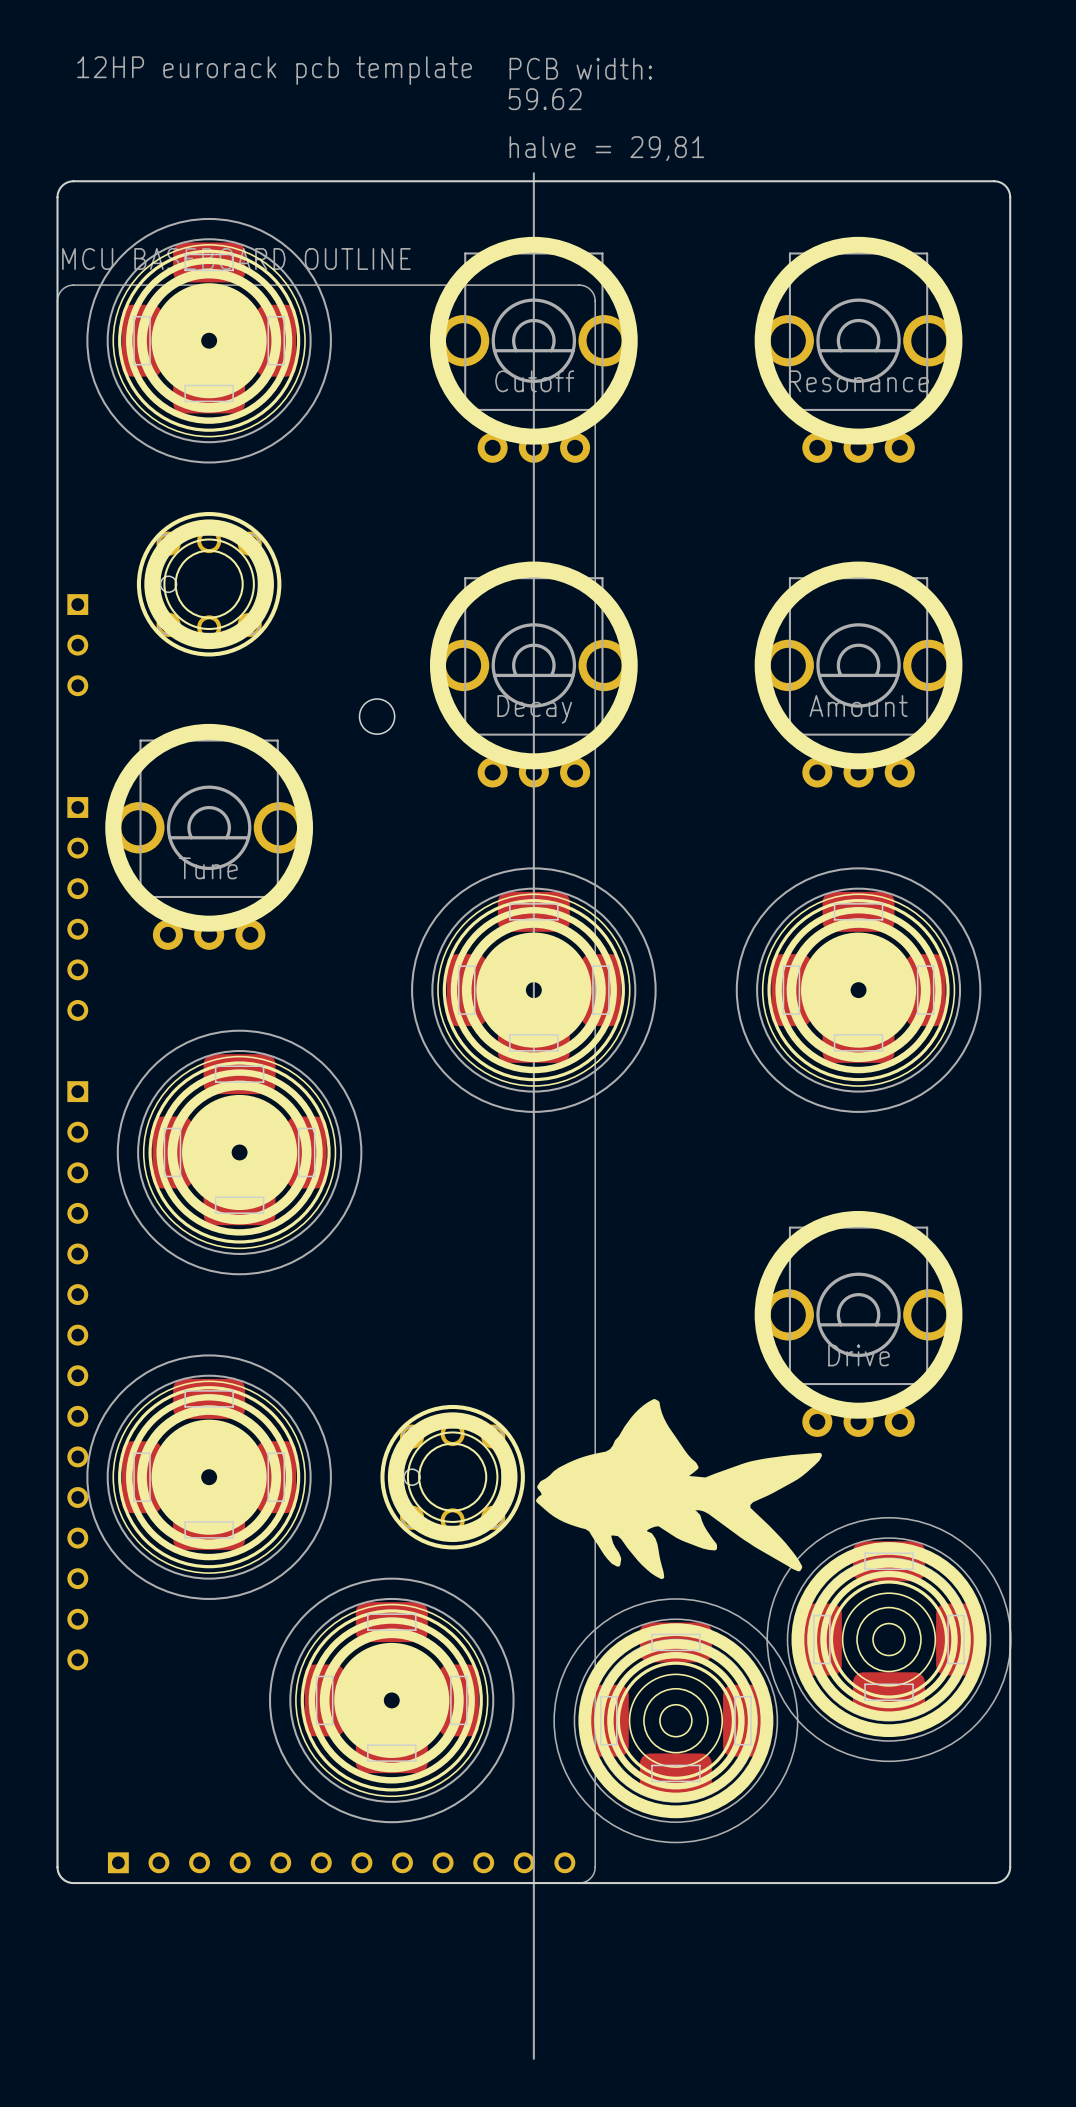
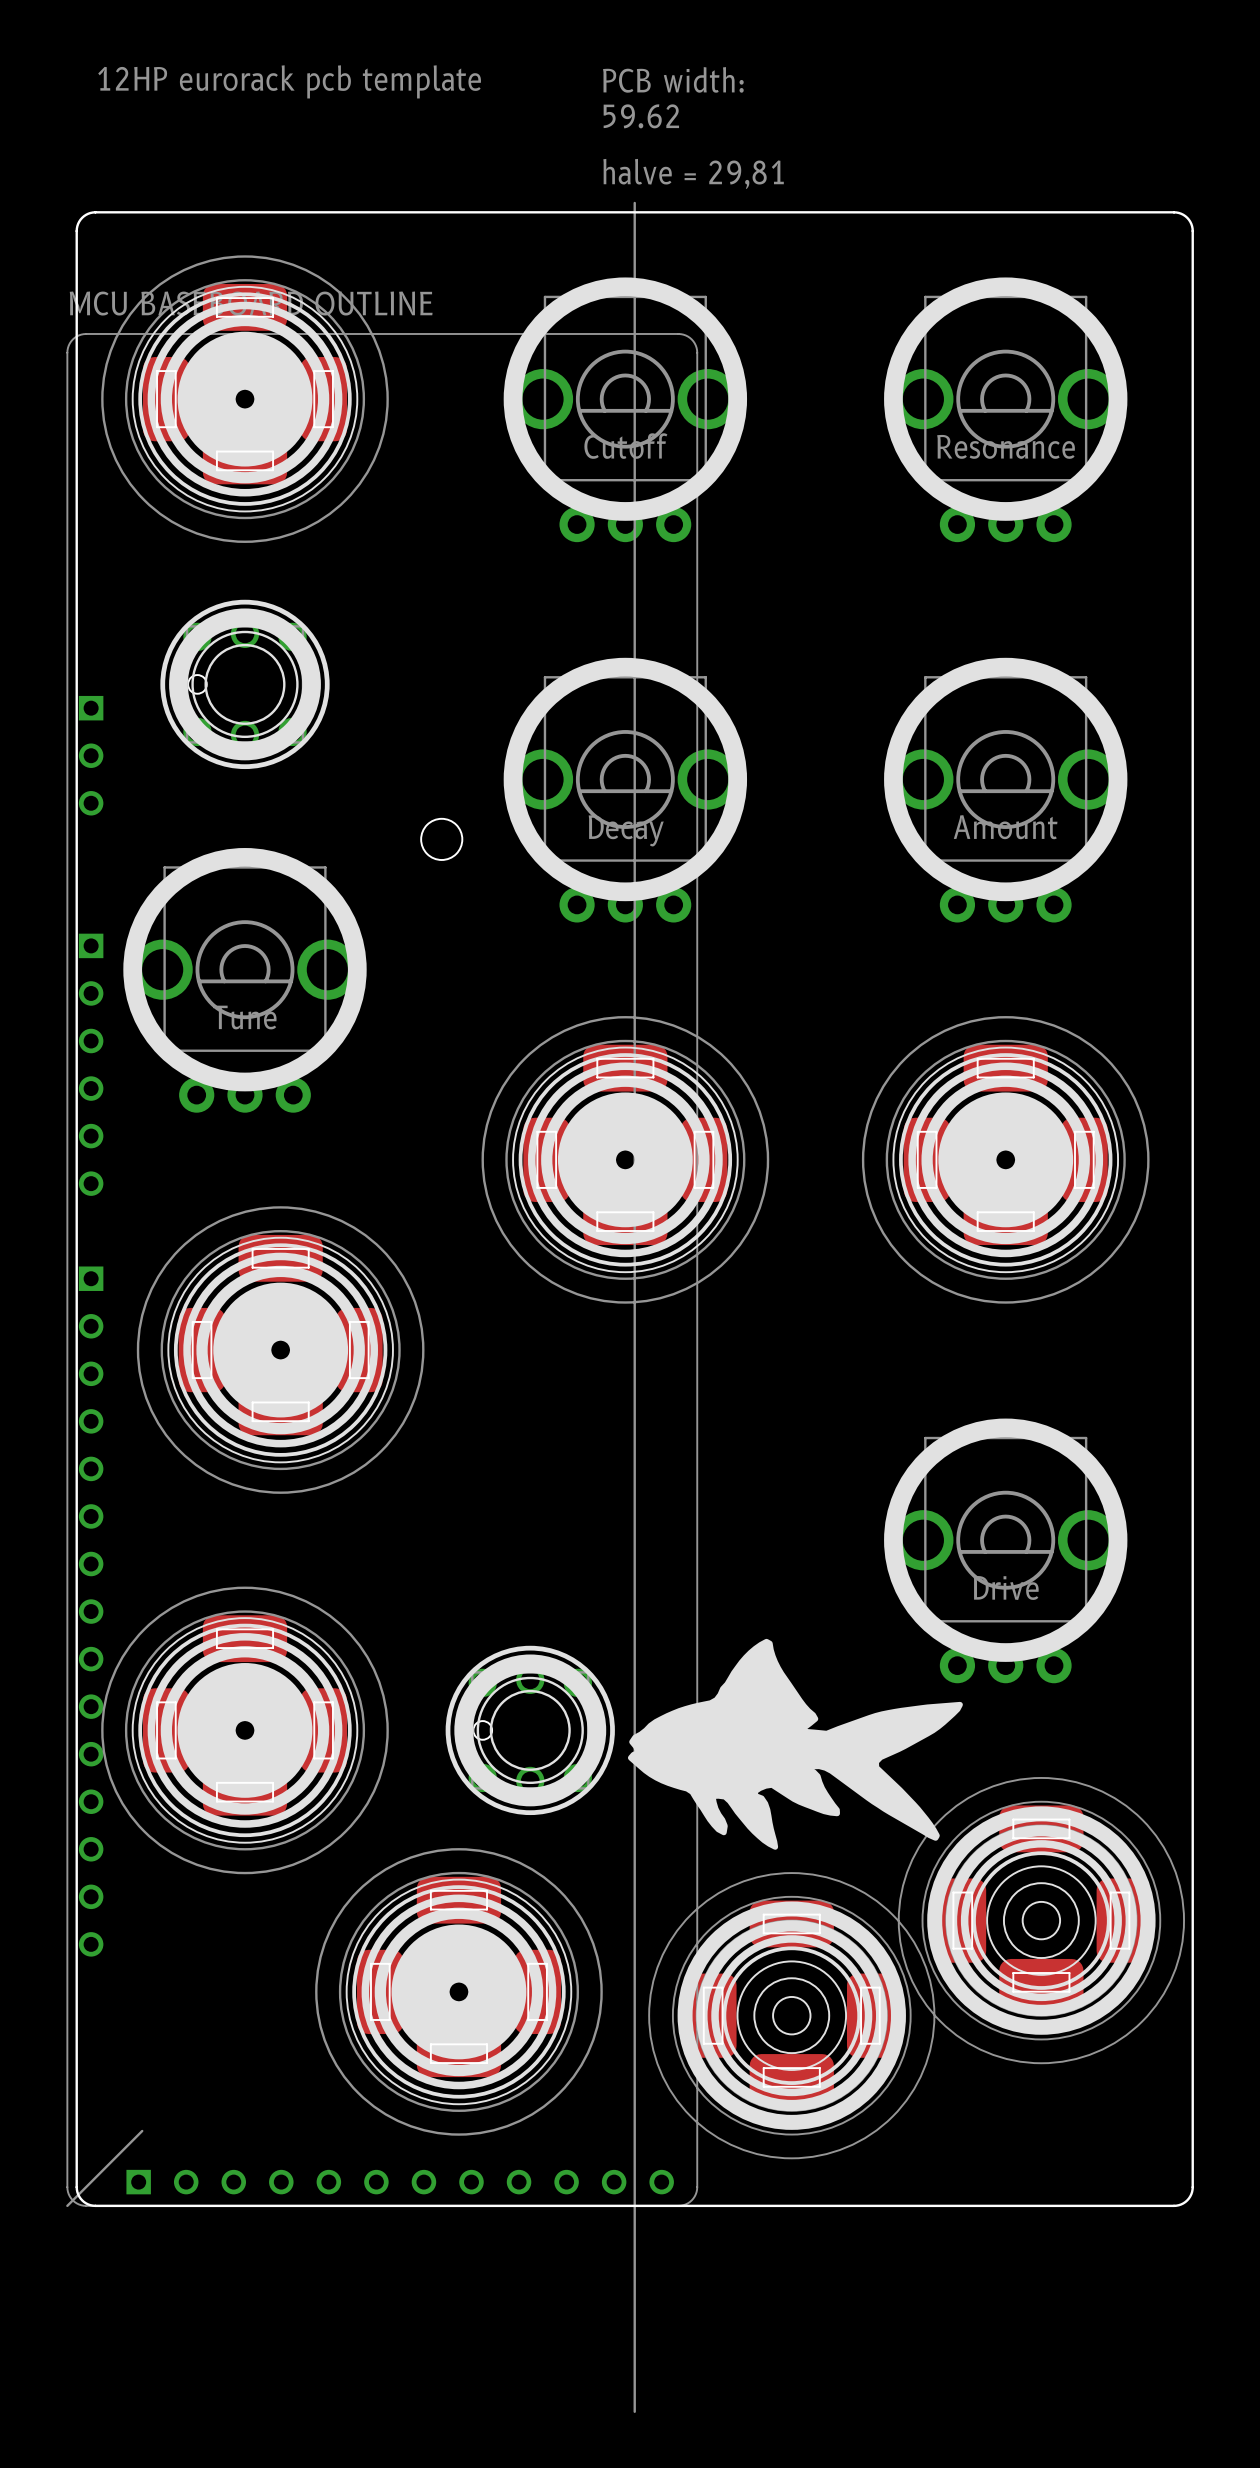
drawing shape: [56, 56, 1012, 2060] -> [66, 65, 1194, 2413]

